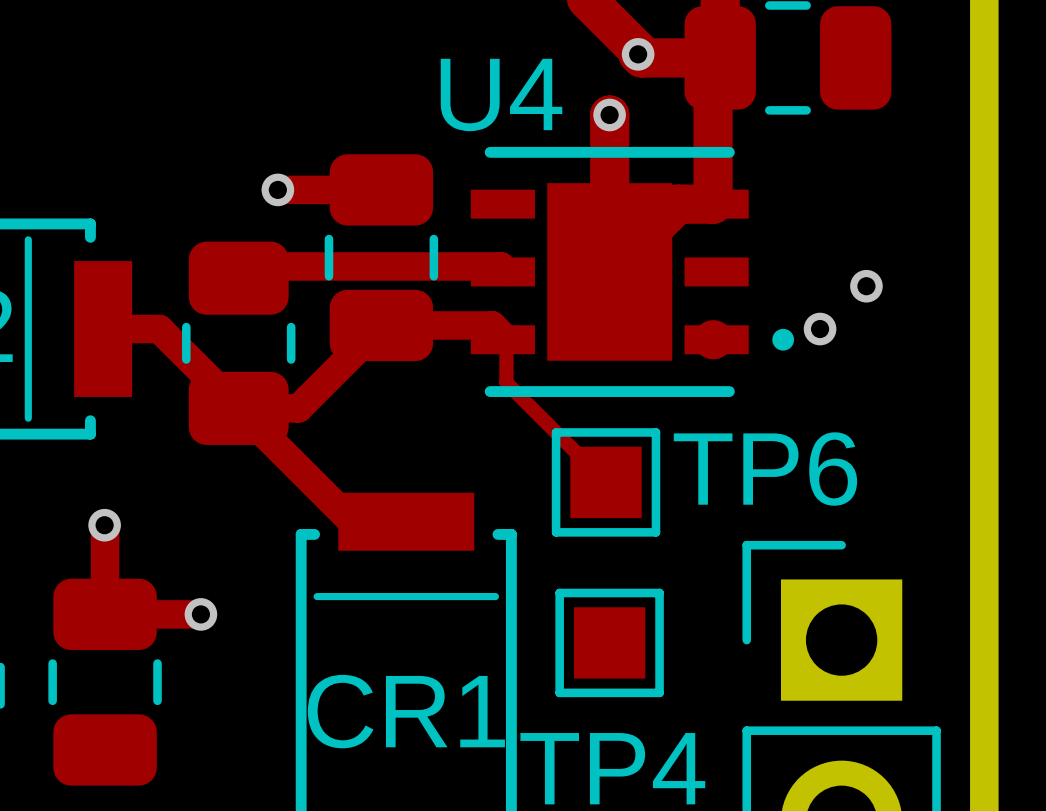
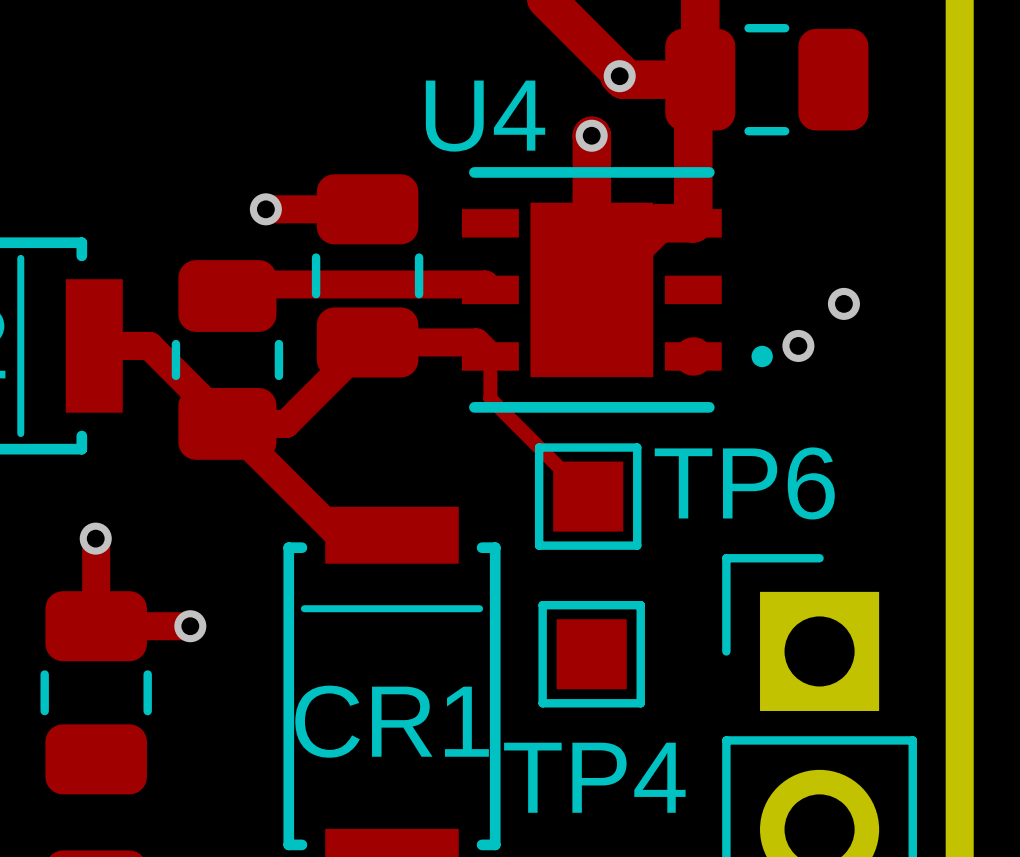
U4 footprint: [470, 146, 795, 397] -> [461, 167, 773, 413]

